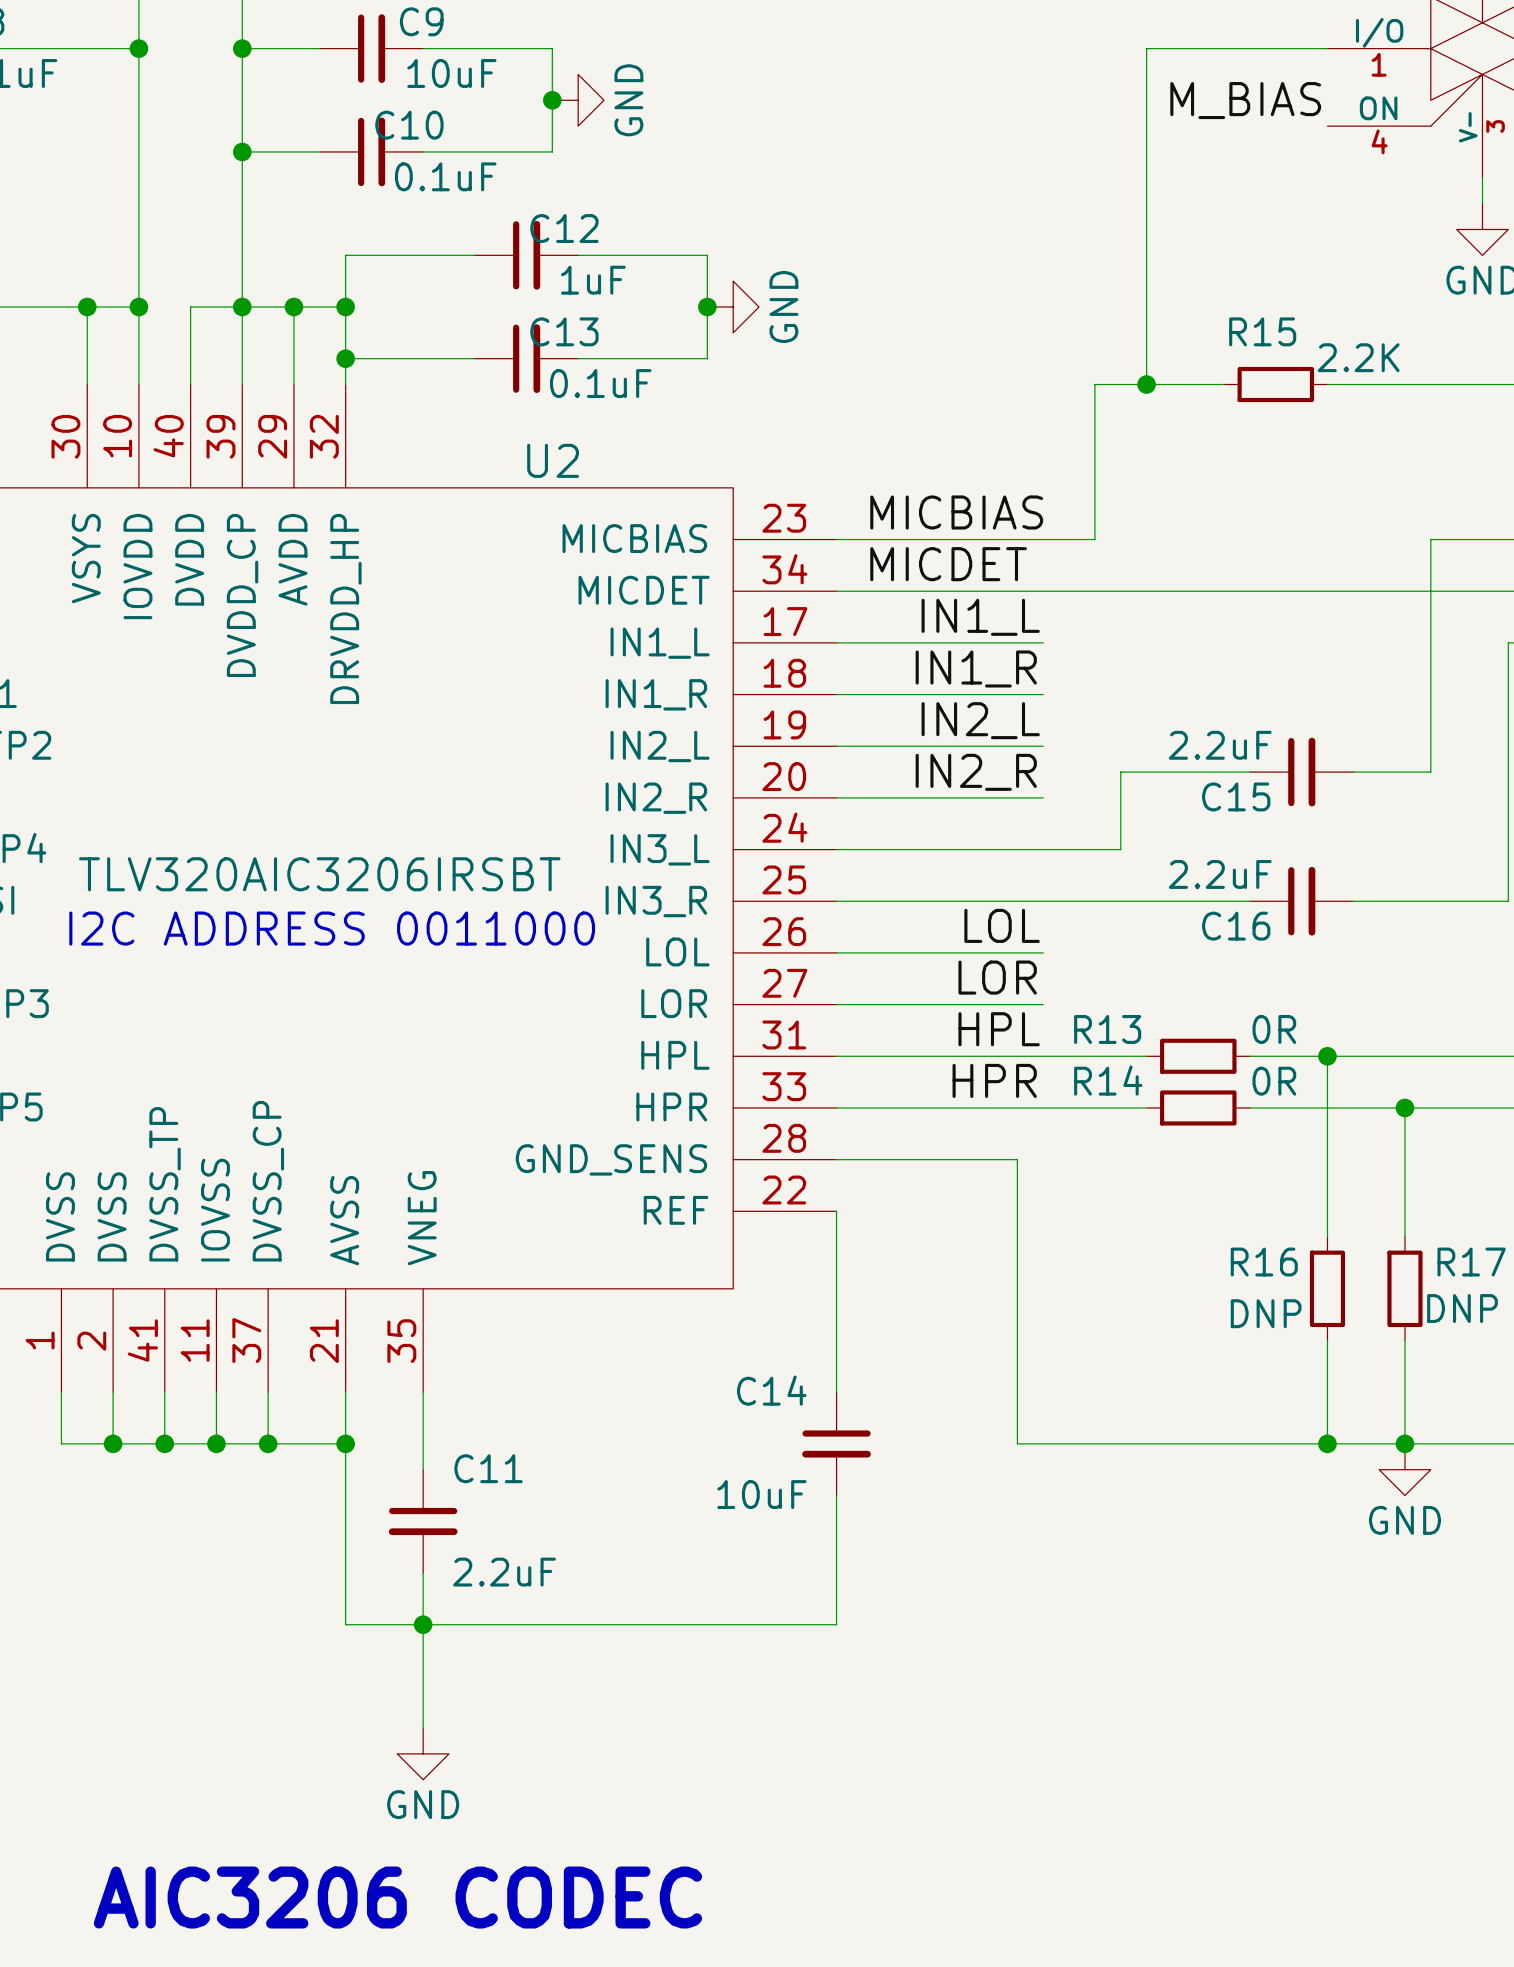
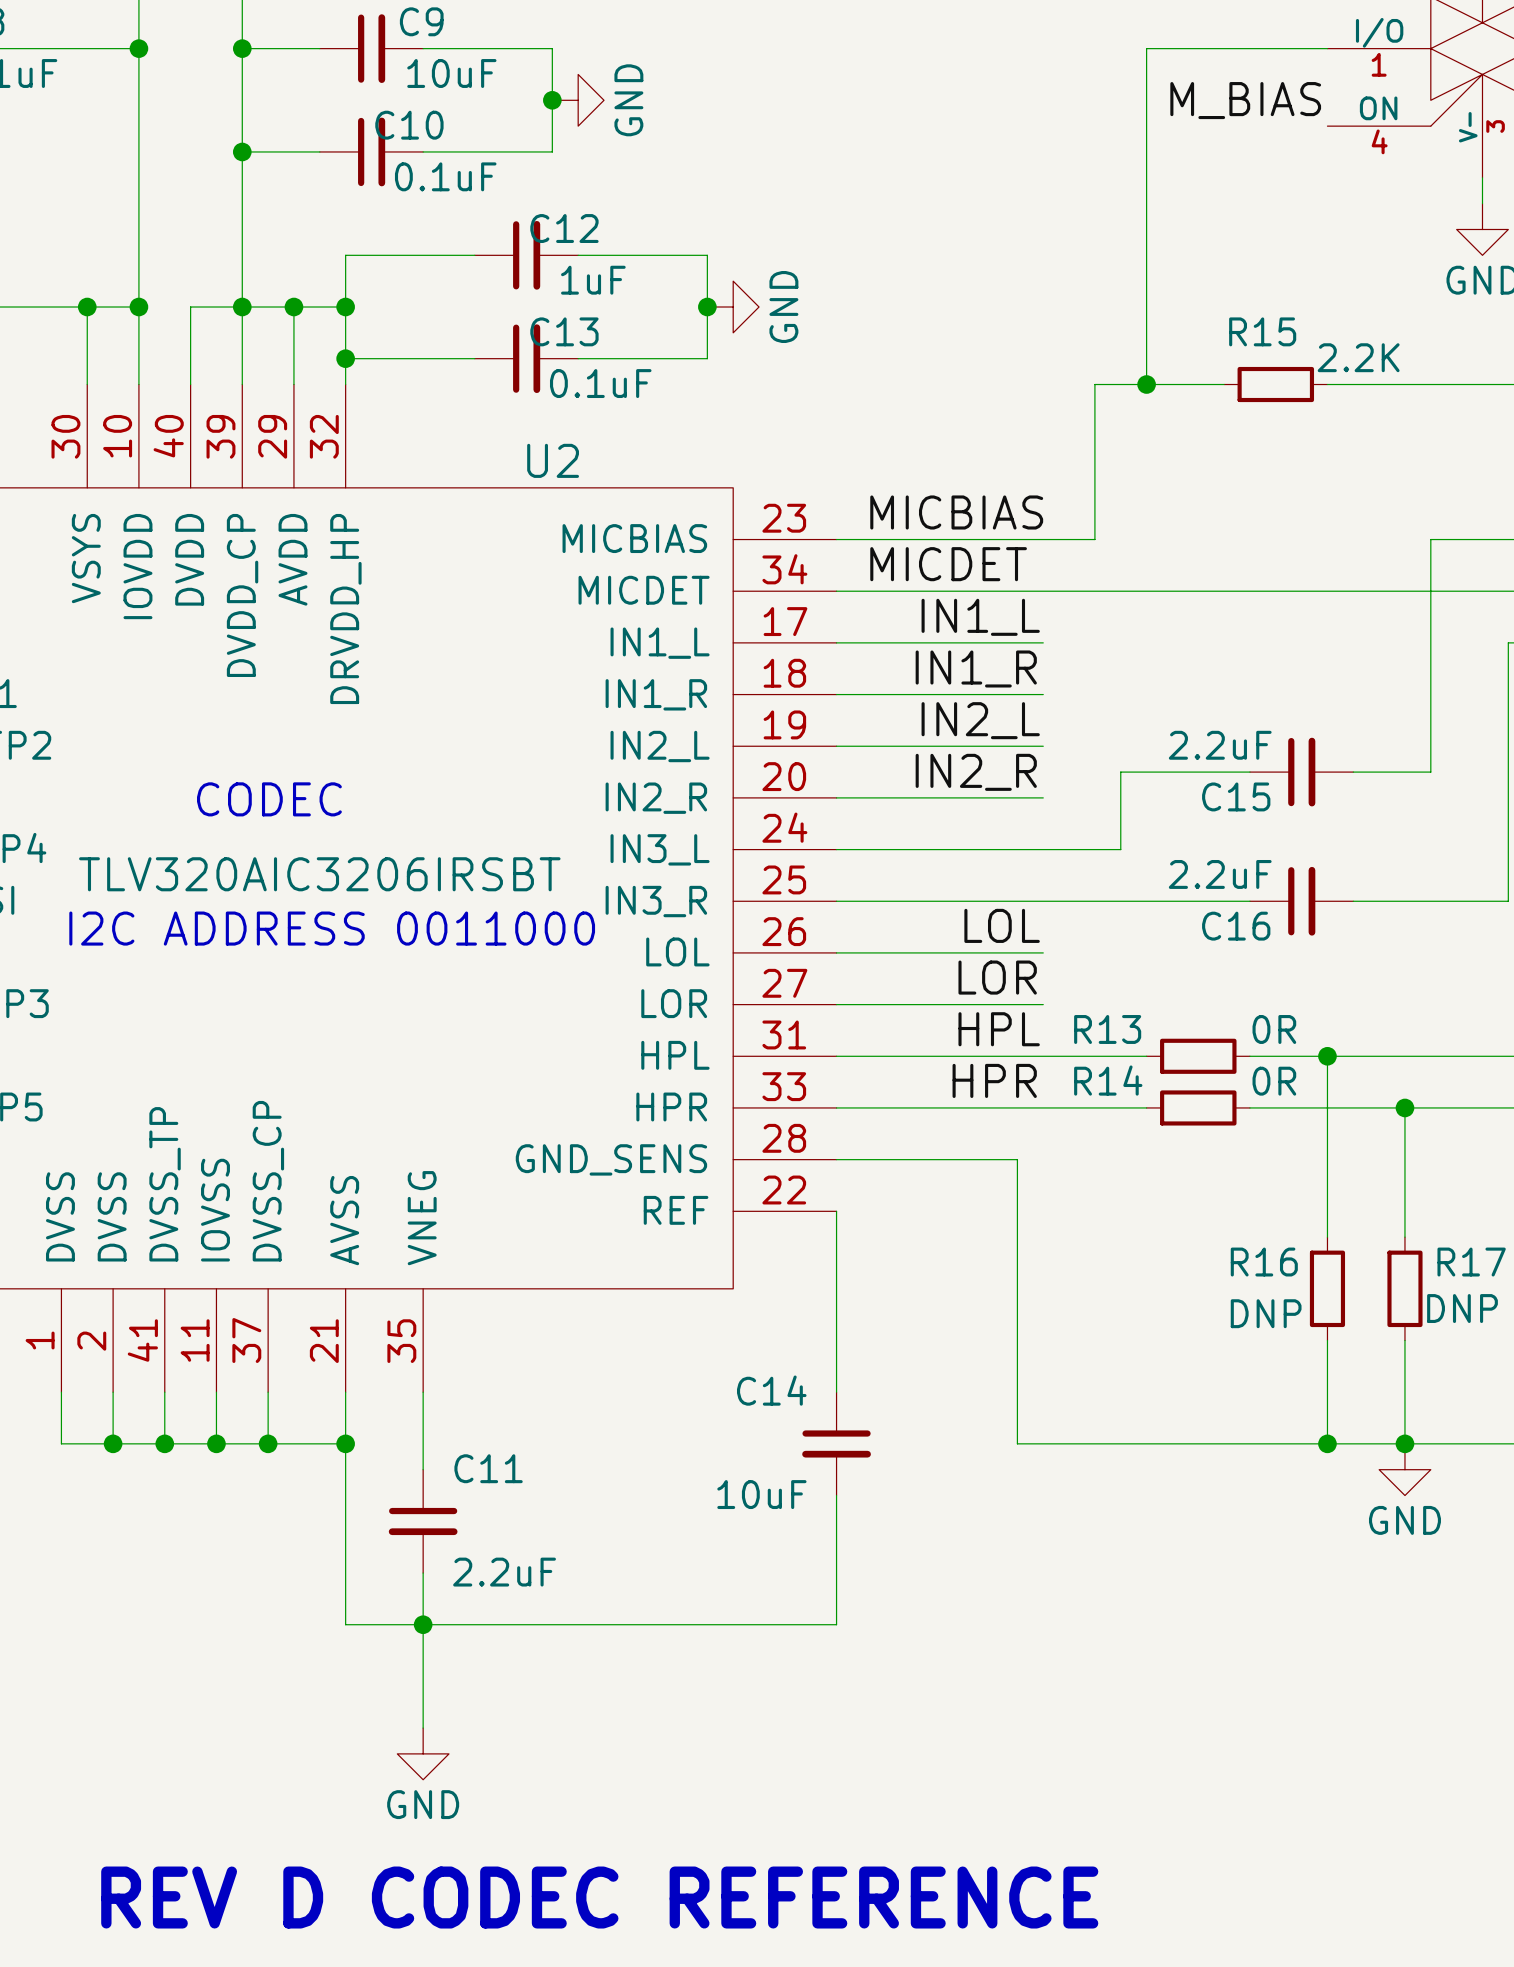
text: none -> CODEC (269, 799)
text: AIC3206 CODEC (397, 1897) -> REV D CODEC REFERENCE (599, 1897)

